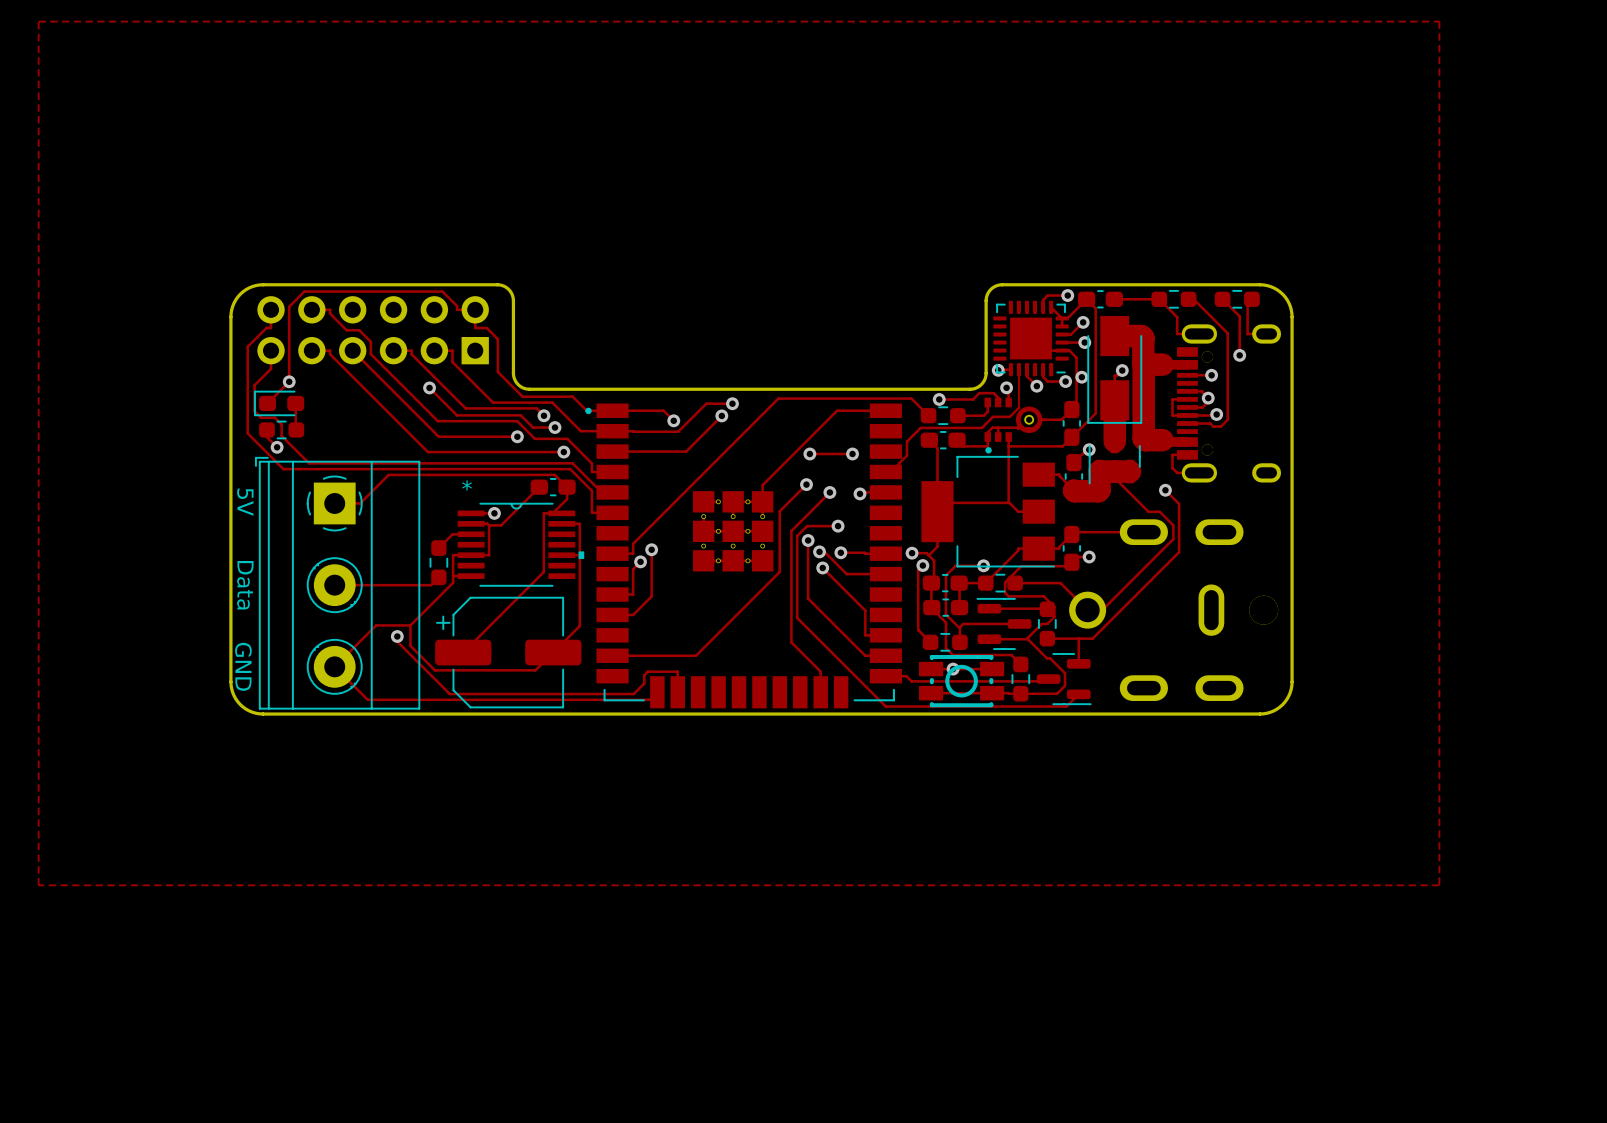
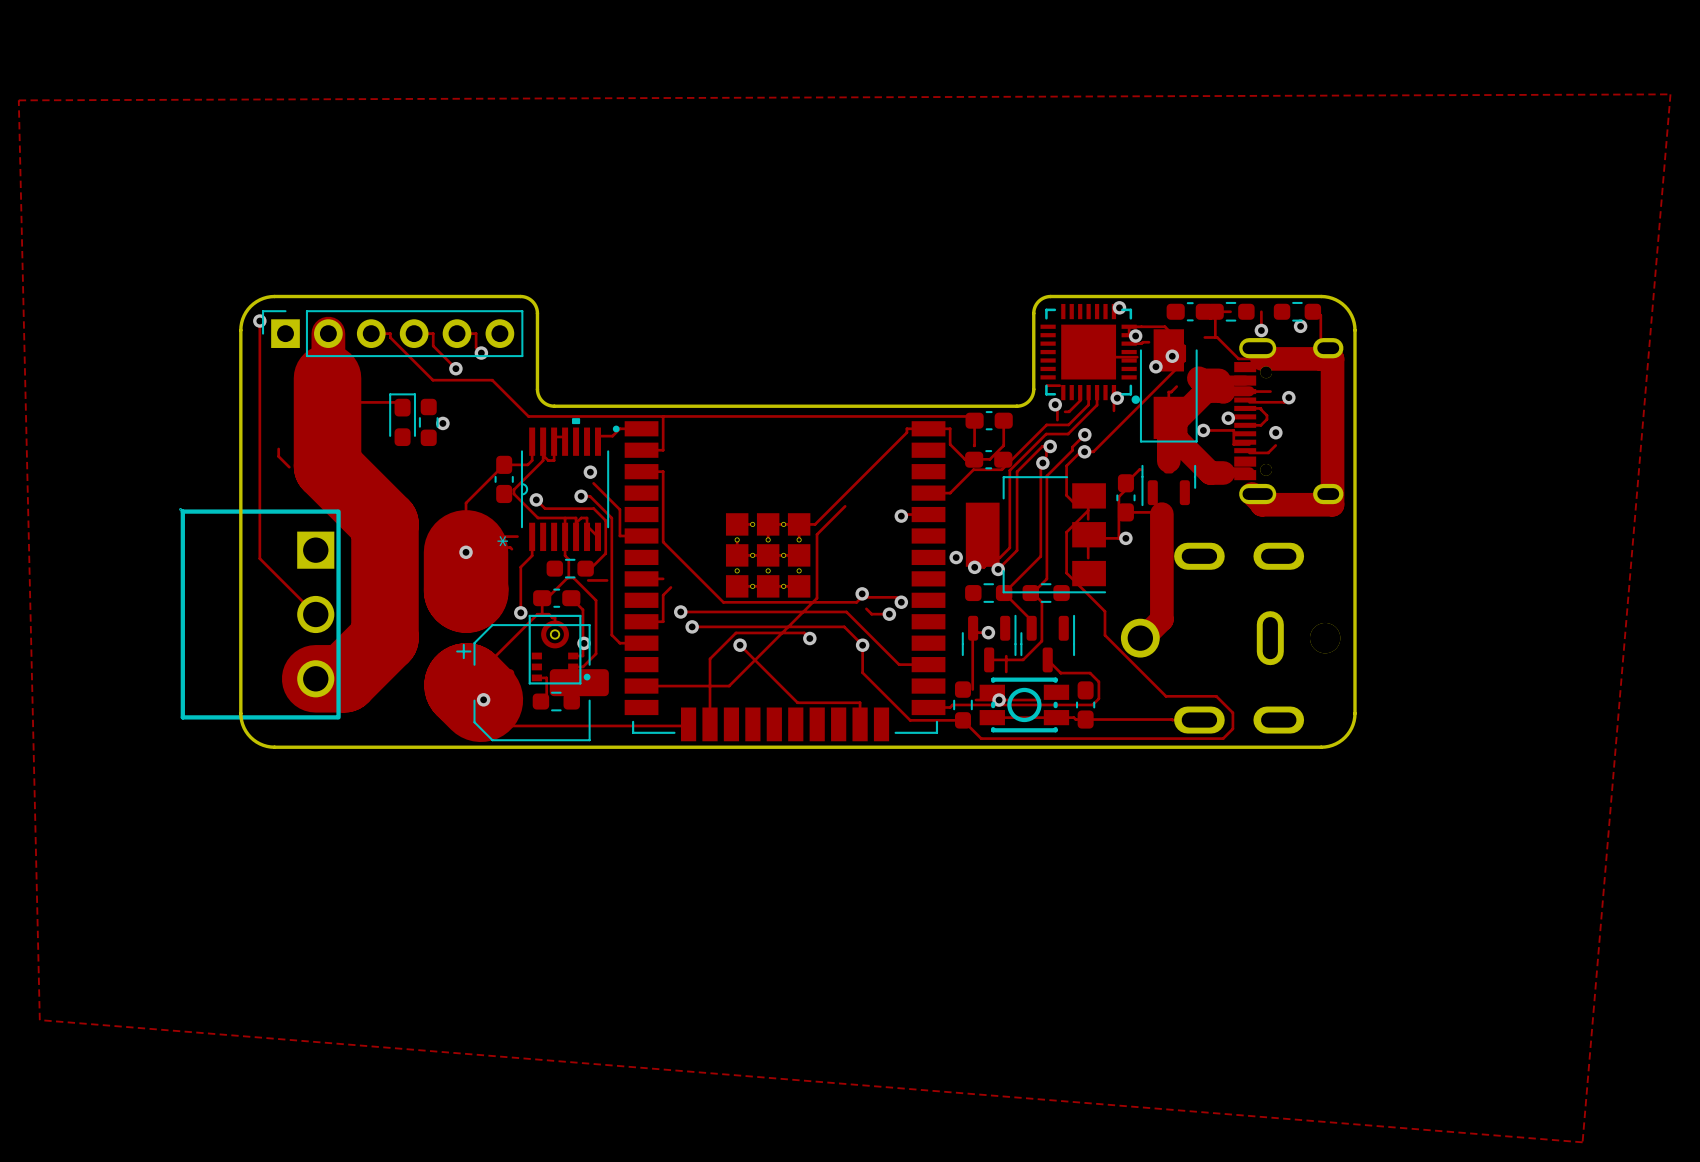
zone outline: (38, 21) (38, 885) (1439, 885) (1439, 21) (38, 21) -> (1670, 94) (18, 100) (39, 1020) (1582, 1142) (1670, 94)
track: (1067, 295) (1047, 295) (1043, 300) (1043, 307) -> none
part footprint: [257, 296, 489, 365] -> [262, 310, 524, 358]
part position: (1100, 299) -> (1190, 311)
track: (1114, 299) (1149, 299) -> none
track: (1159, 299) (1177, 317) (1177, 333) (1199, 333) -> (1215, 311) (1215, 337)
track: none -> (1215, 311) (1230, 311)
track: (1188, 299) (1193, 299) (1227, 333) (1227, 419) (1220, 426) (1213, 426) (1210, 423) (1187, 423) -> none
track: none -> (1261, 311) (1261, 330)
track: (1222, 299) (1239, 316) (1239, 355) -> none
track: (1251, 299) (1247, 303) (1247, 333) (1266, 333) -> none
track: none -> (1317, 311) (1320, 315) (1320, 358)
part footprint: [993, 300, 1069, 377] -> [1040, 303, 1141, 404]
track: (1051, 307) (1062, 318) -> none
track: none -> (259, 321) (259, 558) (315, 614)
via: none -> (259, 321)
track: (271, 309) (271, 328) (266, 328) (247, 346) (247, 433) (283, 469) (570, 469) (591, 490) -> (593, 483) (619, 509) (619, 512)
track: (311, 309) (330, 309) (330, 313) (346, 330) (359, 330) (370, 341) (370, 354) (437, 421) (517, 421) (534, 438) (567, 438) (591, 463) (591, 472) (612, 472) -> none
via: none -> (1300, 326)
via: none -> (1261, 330)
track: (1062, 318) (1067, 318) (1086, 299) (1095, 308) (1095, 413) (1062, 446) (1008, 446) -> none
track: (1062, 318) (1062, 326) -> none
track: none -> (328, 333) (327, 466) (384, 523) (384, 638) (344, 678) (315, 678)
track: none -> (371, 333) (390, 333) (390, 337) (432, 380) (492, 380) (528, 416) (970, 416) (974, 420) (974, 445)
track: none -> (414, 333) (433, 333) (433, 346) (455, 368)
track: none -> (457, 333) (476, 333) (476, 347) (481, 353)
track: none -> (1129, 335) (1129, 326) (1164, 326) (1184, 346) (1184, 360) (1093, 451) (1080, 451) (1066, 465) (1066, 495) (1072, 501) (1088, 501) (1088, 519)
track: (1083, 322) (1071, 334) (1062, 334) -> none
track: none -> (1204, 337) (1217, 337) (1238, 358) (1332, 358) (1332, 504) (1261, 504) (1249, 491) (1249, 485)
track: none -> (1148, 342) (1129, 343)
track: (1114, 336) (1141, 336) (1143, 338) (1143, 438) (1164, 442) (1187, 442) -> none
via: none -> (481, 353)
track: (1031, 338) (1043, 350) (1069, 350) (1076, 357) (1076, 404) (1061, 419) (1039, 419) -> none
via: none -> (1172, 356)
via: (1084, 342) -> none
track: (271, 350) (271, 368) (254, 385) (254, 411) (261, 417) (274, 417) (281, 424) (281, 435) (309, 463) (572, 463) (601, 492) (612, 492) -> none
track: (311, 350) (330, 350) (330, 354) (427, 452) (563, 452) -> none
track: (352, 350) (438, 436) (517, 436) -> none
track: (393, 350) (411, 350) (411, 354) (465, 408) (536, 408) (543, 415) -> none
track: (434, 350) (452, 350) (452, 362) (492, 402) (552, 402) (580, 431) (612, 431) -> none
via: none -> (1155, 366)
via: none -> (455, 368)
via: (1239, 355) -> none
track: (1018, 369) (1018, 407) (1009, 416) (992, 416) (981, 427) (920, 427) (906, 441) (906, 455) (890, 472) -> (1088, 392) (1088, 404) (1068, 424) (1046, 424) (1001, 469) (973, 469) (950, 493) (933, 493)
track: (1027, 369) (1027, 376) (1036, 386) -> none
track: (1043, 369) (1043, 376) (1047, 381) (1065, 381) -> none
via: (998, 370) -> none
via: (1122, 370) -> none
track: none -> (1249, 391) (1206, 391) (1175, 421) (1175, 438) (1210, 472) (1249, 472)
via: (1211, 375) -> none
track: none -> (1080, 392) (1080, 400) (1069, 411) (1065, 411)
track: none -> (1097, 392) (1097, 405) (1068, 434) (1046, 434) (1009, 470) (1009, 547) (999, 557) (993, 557) (984, 567) (974, 567)
track: none -> (1113, 392) (1113, 410)
via: (1081, 377) -> none
via: (289, 381) -> none
track: none -> (1288, 397) (1284, 402) (1249, 402)
via: none -> (1288, 397)
track: none -> (327, 402) (397, 402) (402, 407)
via: (1036, 386) -> none
track: (429, 387) (456, 415) (520, 415) (533, 427) (554, 427) -> none
via: (429, 387) -> none
via: (1208, 398) -> none
track: (939, 399) (973, 399) (979, 393) (993, 393) (998, 397) (998, 402) -> none
via: (939, 399) -> none
track: (1187, 399) (1172, 399) (1172, 415) (1216, 414) -> none
via: none -> (1228, 418)
track: (987, 402) (987, 411) (983, 415) (957, 415) -> none
track: (267, 403) (289, 381) (289, 306) (304, 291) (442, 291) (457, 306) (457, 309) (475, 309) (475, 328) (486, 328) (497, 339) (497, 371) (522, 396) (572, 396) (586, 410) (591, 410) -> (597, 441) (597, 436) (612, 436) (619, 428)
part rotation: 0° (279, 403) -> 90° clockwise (402, 419)
part position: (279, 403) -> (402, 419)
track: (732, 403) (706, 403) (678, 431) (633, 431) -> (663, 416) (663, 450)
via: (732, 403) -> none
track: none -> (1003, 420) (1003, 445) (989, 459) (965, 459) (950, 444) (950, 428) (928, 428)
part: none -> (428, 422)
via: none -> (442, 423)
part footprint: [920, 406, 966, 426] -> [965, 411, 1013, 431]
track: (612, 410) (663, 410) (673, 420) -> none
track: (865, 410) (837, 410) (762, 485) (762, 501) -> (906, 428) (906, 432) (815, 524) (799, 524)
track: none -> (1203, 430) (1233, 430) (1233, 444) (1249, 444)
via: none -> (1203, 430)
via: (543, 415) -> none
track: (721, 415) (686, 451) (633, 451) -> (901, 602) (896, 597) (861, 597) (856, 602) (723, 602) (663, 542) (663, 471)
via: (721, 415) -> none
track: (928, 415) (911, 398) (778, 398) (633, 543) (633, 553) -> none
track: none -> (1084, 434) (1072, 447) (1072, 450) (1046, 475) (1046, 579) (1032, 593) (1041, 602) (1041, 641) (1023, 659) (989, 659)
via: none -> (1084, 434)
track: (1042, 419) (1033, 428) (992, 427) (987, 432) (987, 446) (963, 446) (957, 440) -> none
via: (673, 420) -> none
track: none -> (532, 441) (532, 460) (527, 464) (504, 464) (466, 503) (466, 590)
track: none -> (543, 441) (543, 460) (513, 489) (513, 493) (537, 518) (576, 518) (576, 536)
track: none -> (565, 441) (565, 436) (554, 436) (554, 460) (548, 460) (543, 455)
part: (1071, 423) -> none
part: (1013, 425) -> none
track: none -> (1275, 445) (1268, 452) (1249, 452)
via: (554, 427) -> none
track: none -> (1050, 446) (1042, 446) (1017, 471) (1017, 550) (998, 569)
via: none -> (1050, 446)
part: (281, 429) -> none
via: none -> (1084, 451)
via: (517, 436) -> none
track: (1008, 437) (1008, 502) -> none
track: (929, 440) (937, 448) (937, 546) (928, 555) -> none
track: none -> (1042, 463) (1040, 465) (1040, 556) (1004, 593) (1031, 620) (1031, 628)
via: none -> (1042, 463)
via: (277, 447) -> none
via: (1089, 449) -> none
track: (809, 453) (852, 453) -> none
via: (809, 453) -> none
via: (852, 453) -> none
track: (1187, 454) (1172, 454) (1172, 468) (1177, 472) (1199, 472) -> none
part: none -> (504, 479)
track: none -> (1132, 483) (1118, 496) (1118, 538)
track: (1114, 471) (1114, 478) (1148, 511) (1159, 511) (1173, 525) (1173, 539) (1102, 610) (1087, 610) (1060, 583) (1015, 583) -> none
track: (1130, 471) (1099, 471) (1098, 491) (1074, 491) (1059, 474) (1038, 474) -> none
via: none -> (581, 496)
track: none -> (536, 499) (545, 508) (593, 508) (605, 520) (605, 553) (590, 568) (585, 568)
via: none -> (536, 499)
via: (806, 484) -> none
track: (539, 487) (501, 525) (489, 525) (489, 555) (453, 555) (453, 582) (410, 625) -> none
part: (553, 487) -> none
track: none -> (1088, 510) (1066, 532) (1066, 573) (1104, 611) (1104, 635) (1166, 696) (1216, 696) (1232, 712) (1232, 728) (1223, 738) (981, 738) (962, 720) (910, 720) (862, 672) (862, 645) (844, 626) (692, 626)
track: none -> (1132, 512) (1160, 512) (1161, 514) (1161, 619) (1143, 638)
track: (1165, 490) (1179, 503) (1179, 552) (1092, 638) (1047, 638) -> none
via: (1165, 490) -> none
track: (829, 492) (791, 530) (791, 642) (820, 671) -> (740, 645) (797, 702) (860, 702)
via: (829, 492) -> none
track: none -> (565, 518) (565, 555) (568, 559) (568, 577)
track: none -> (576, 523) (581, 518) (587, 518) (587, 536)
text: 5V (245, 502) -> none
track: (937, 502) (1009, 502) (1018, 511) (1038, 511) -> none
track: (334, 503) (360, 503) (388, 474) (554, 474) (567, 487) (567, 499) (552, 513) -> none
track: none -> (587, 527) (597, 536)
via: (494, 513) -> none
track: none -> (532, 536) (532, 555) (520, 567) (520, 612)
track: (561, 513) (543, 513) (543, 572) (463, 652) -> none
track: none -> (1125, 538) (1090, 538) (1088, 540) (1088, 558)
via: none -> (1125, 538)
track: (561, 523) (579, 523) (579, 626) (535, 670) (434, 670) (410, 645) (410, 625) -> none
track: (838, 526) (807, 526) (797, 535) (797, 617) (885, 706) (1066, 706) (1078, 694) -> none
via: (838, 526) -> none
via: none -> (466, 552)
track: (1143, 532) (1074, 532) (1059, 548) (1018, 548) (985, 583) (959, 583) (959, 607) -> none
via: none -> (956, 557)
track: (808, 540) (808, 598) (865, 655) (885, 655) -> none
via: (808, 540) -> none
via: none -> (974, 567)
part: none -> (570, 568)
part rotation: 0° (520, 544) -> 90° counterclockwise (565, 484)
part position: (520, 544) -> (565, 484)
via: none -> (998, 569)
part: (1071, 548) -> none
track: (651, 549) (651, 596) (633, 614) (612, 614) -> (581, 496) (590, 496) (611, 518) (611, 635) (619, 643) (641, 643)
via: (651, 549) -> none
track: (819, 551) (824, 551) (846, 574) (885, 574) -> none
via: (819, 551) -> none
track: (840, 552) (885, 553) -> none
via: (840, 552) -> none
track: (912, 553) (926, 553) (928, 555) -> none
via: (912, 553) -> none
track: (928, 555) (934, 560) (931, 607) (945, 622) (945, 648) (952, 655) (1011, 655) (1020, 664) -> none
track: (1089, 557) (1077, 557) (1067, 566) (1021, 566) (1005, 582) (1005, 592) (1008, 596) (1043, 596) (1054, 606) (1054, 616) (1047, 623) (1041, 623) (1027, 639) -> none
via: (1089, 557) -> none
via: (640, 561) -> none
part: (438, 562) -> none
track: (922, 565) (918, 570) (918, 629) (930, 642) -> none
via: (922, 565) -> none
track: (983, 565) (955, 565) (945, 575) (945, 614) (958, 627) (963, 623) (1019, 623) -> none
via: (983, 565) -> none
track: (822, 567) (865, 610) (865, 635) -> (680, 611) (846, 611) (899, 664) (906, 664)
part: none -> (556, 598)
track: none -> (571, 598) (582, 609) (582, 655) (573, 655)
part footprint: [922, 573, 968, 593] -> [965, 583, 1013, 603]
via: none -> (901, 602)
track: (438, 577) (431, 585) (334, 585) -> none
track: none -> (866, 608) (871, 614) (889, 614)
part: (337, 583) -> none
part position: (1000, 583) -> (1046, 593)
text: Data (245, 585) -> none
via: none -> (680, 611)
via: none -> (520, 612)
part: none -> (260, 613)
track: none -> (542, 614) (542, 598) (547, 598) (567, 577) (573, 577) (596, 600) (596, 653) (582, 666) (573, 666) (573, 677)
via: none -> (889, 614)
part footprint: [923, 598, 969, 617] -> [961, 614, 1017, 673]
via: none -> (692, 626)
track: none -> (988, 632) (977, 632) (972, 637) (972, 689)
via: none -> (988, 632)
track: (989, 608) (1047, 609) -> none
via: none -> (809, 638)
via: none -> (584, 643)
via: none -> (740, 645)
via: none -> (862, 645)
part: none -> (559, 649)
part rotation: 0° (1004, 623) -> 90° clockwise (1047, 643)
part: (1047, 623) -> none
track: (410, 625) (376, 625) (334, 666) (367, 699) (649, 699) (655, 693) -> (555, 623) (555, 617) (548, 614) (537, 614) (466, 685) (509, 725) (686, 725)
track: (397, 636) (397, 641) (449, 694) (633, 694) (644, 683) (644, 675) (647, 671) (677, 671) -> (809, 638) (804, 632) (735, 632) (710, 658) (710, 702)
via: (397, 636) -> none
track: (1078, 638) (1078, 663) -> none
track: (989, 639) (1027, 639) -> none
track: (1027, 639) (1065, 673) (1065, 685) (1057, 693) (931, 693) -> none
part rotation: 0° (945, 642) -> 90° clockwise (962, 704)
part position: (945, 642) -> (962, 704)
track: none -> (536, 677) (546, 677) (546, 695) (540, 701)
text: GND (243, 666) -> none
via: none -> (483, 699)
part: none -> (556, 701)
part: none -> (1085, 704)
track: (906, 676) (911, 681) (1046, 681) (1048, 679) -> (950, 707) (952, 704) (1092, 704) (1098, 698) (1098, 681) (1090, 673) (1060, 673) (1047, 659)
part: (1020, 679) -> none
part: (1064, 679) -> none
part position: (961, 681) -> (1024, 704)
track: none -> (992, 717) (1202, 720)

